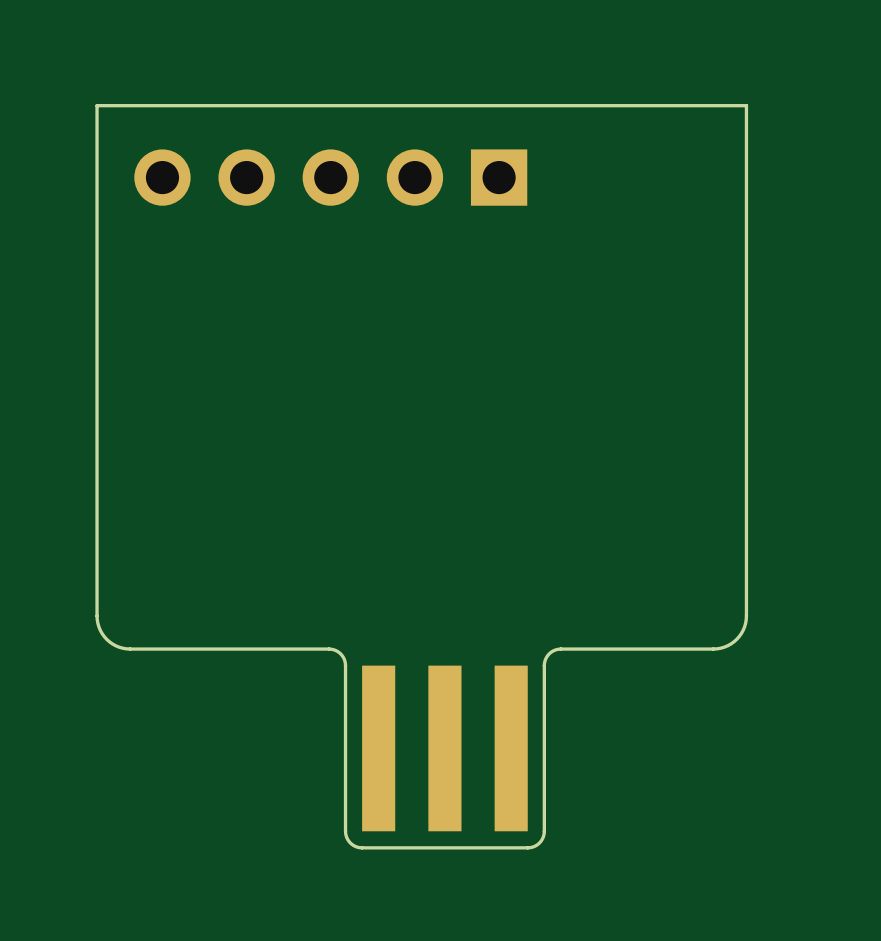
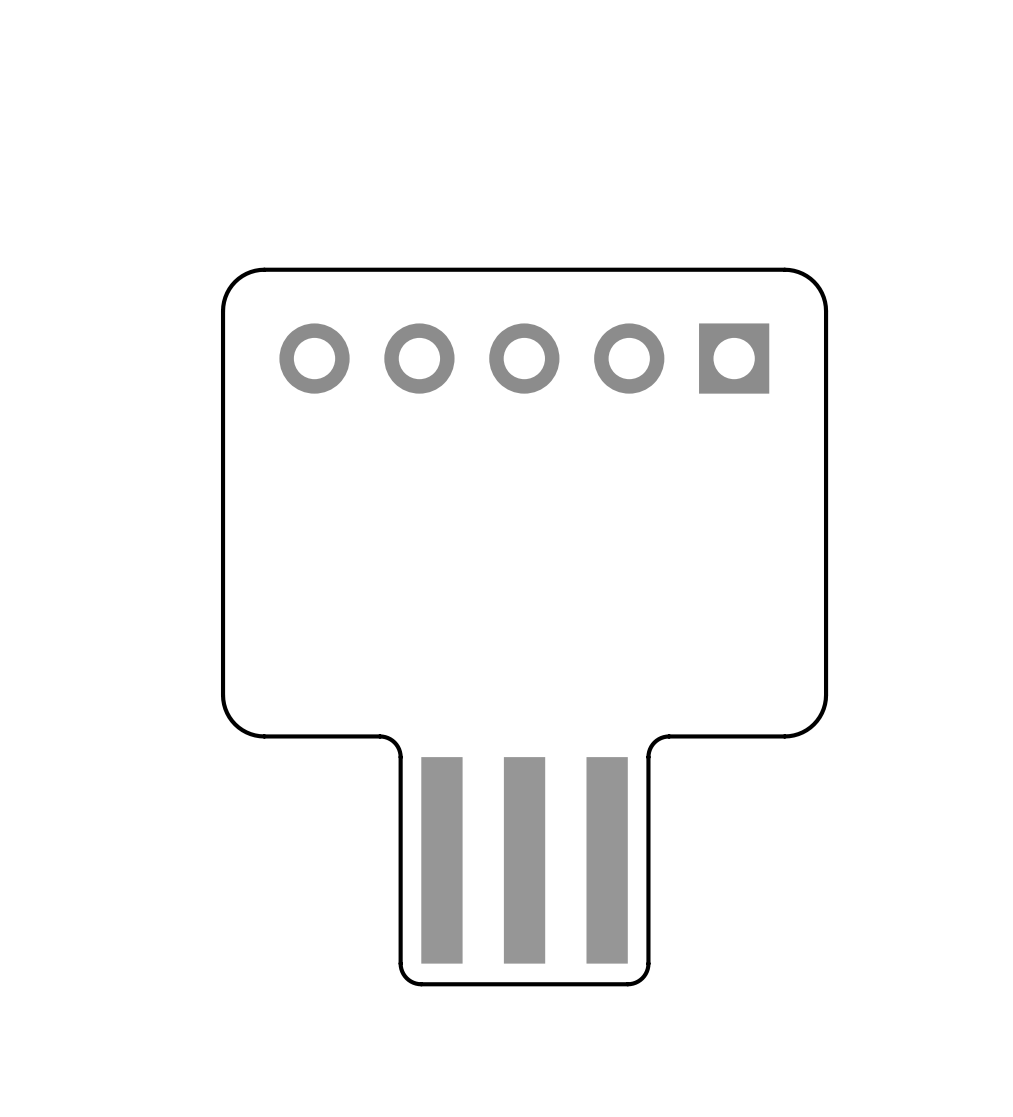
part position: (330, 177) -> (524, 358)
board edge: (653, 649) (720, 648) (736, 639) (745, 623) (746, 105) (97, 105) (97, 623) (106, 639) (122, 648) (236, 649) -> (784, 736) (798, 734) (813, 724) (821, 713) (826, 695) (825, 306) (821, 293) (813, 281) (802, 273) (784, 269) (264, 269) (246, 273) (235, 281) (227, 293) (223, 311) (223, 699) (227, 713) (235, 724) (246, 732) (264, 736)

